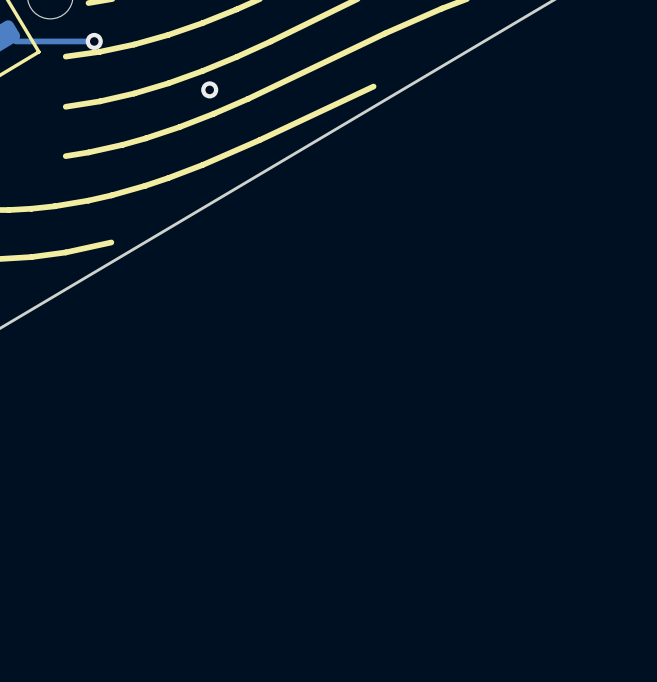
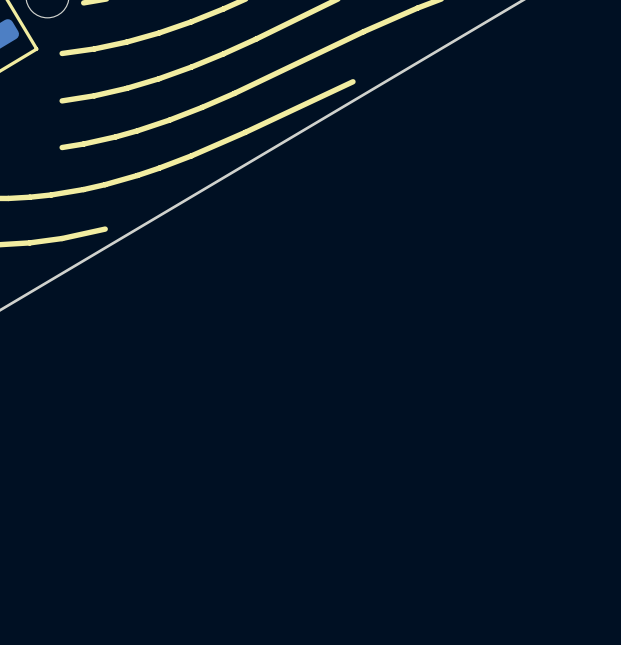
track: (94, 41) (15, 41) -> none
via: (94, 41) -> none
via: (209, 89) -> none

